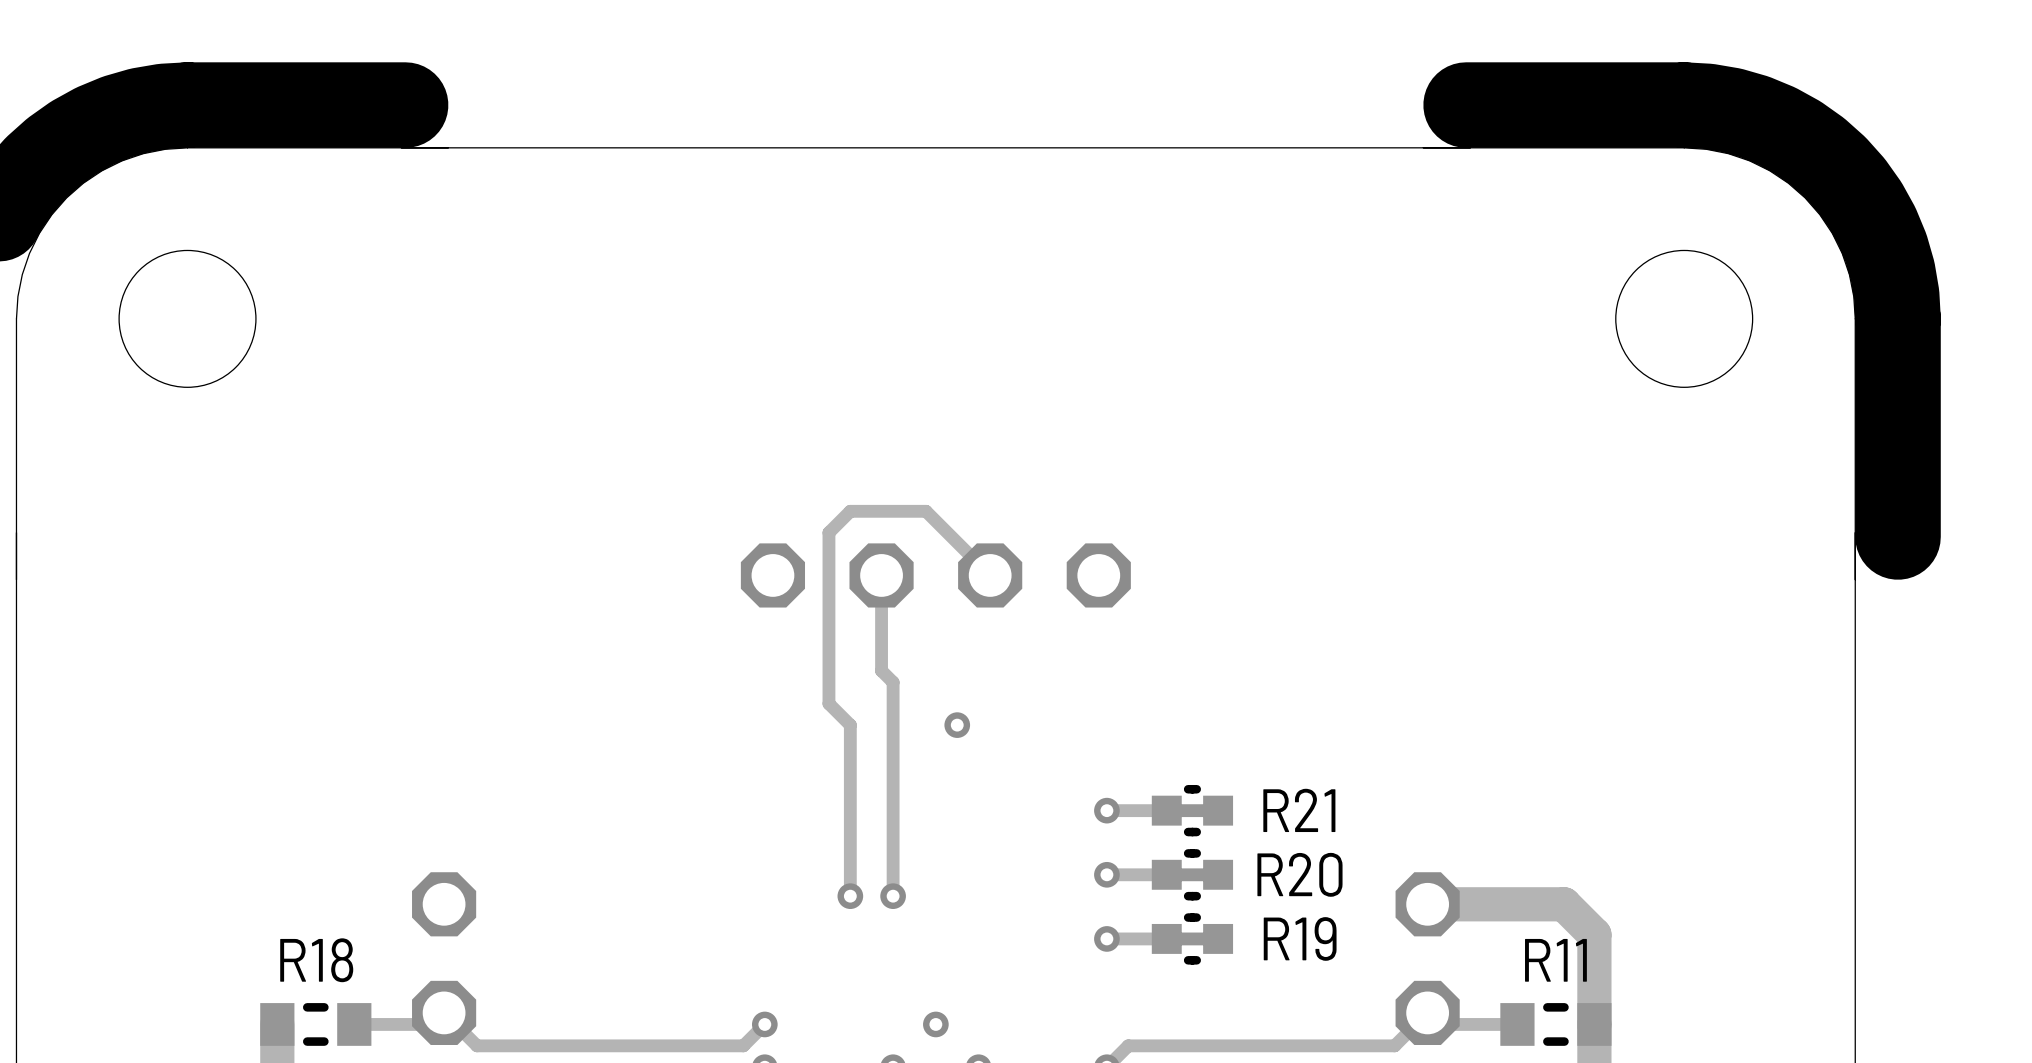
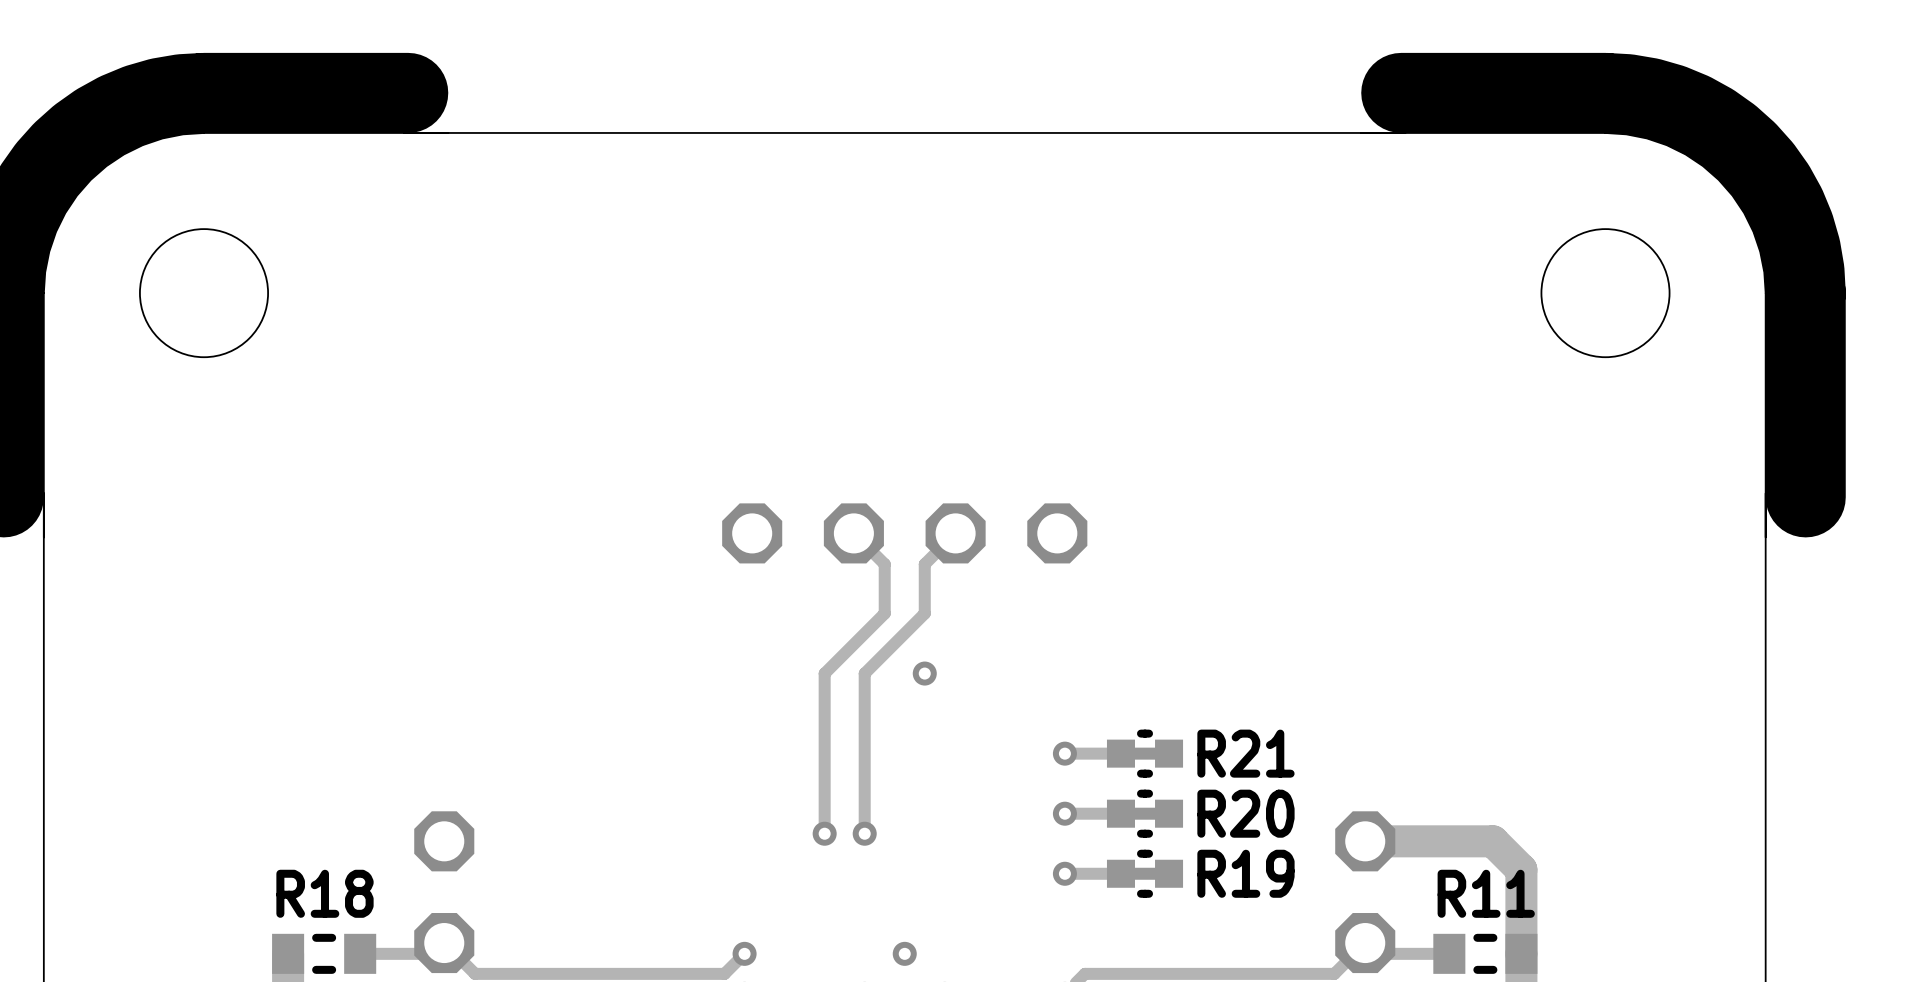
track: (881, 575) (881, 670) (893, 682) (893, 725) -> (853, 533) (884, 564) (884, 613) (824, 673)
track: (990, 575) (926, 511) (850, 511) (828, 532) (828, 703) (850, 725) -> (955, 533) (924, 564) (924, 613) (864, 673)

